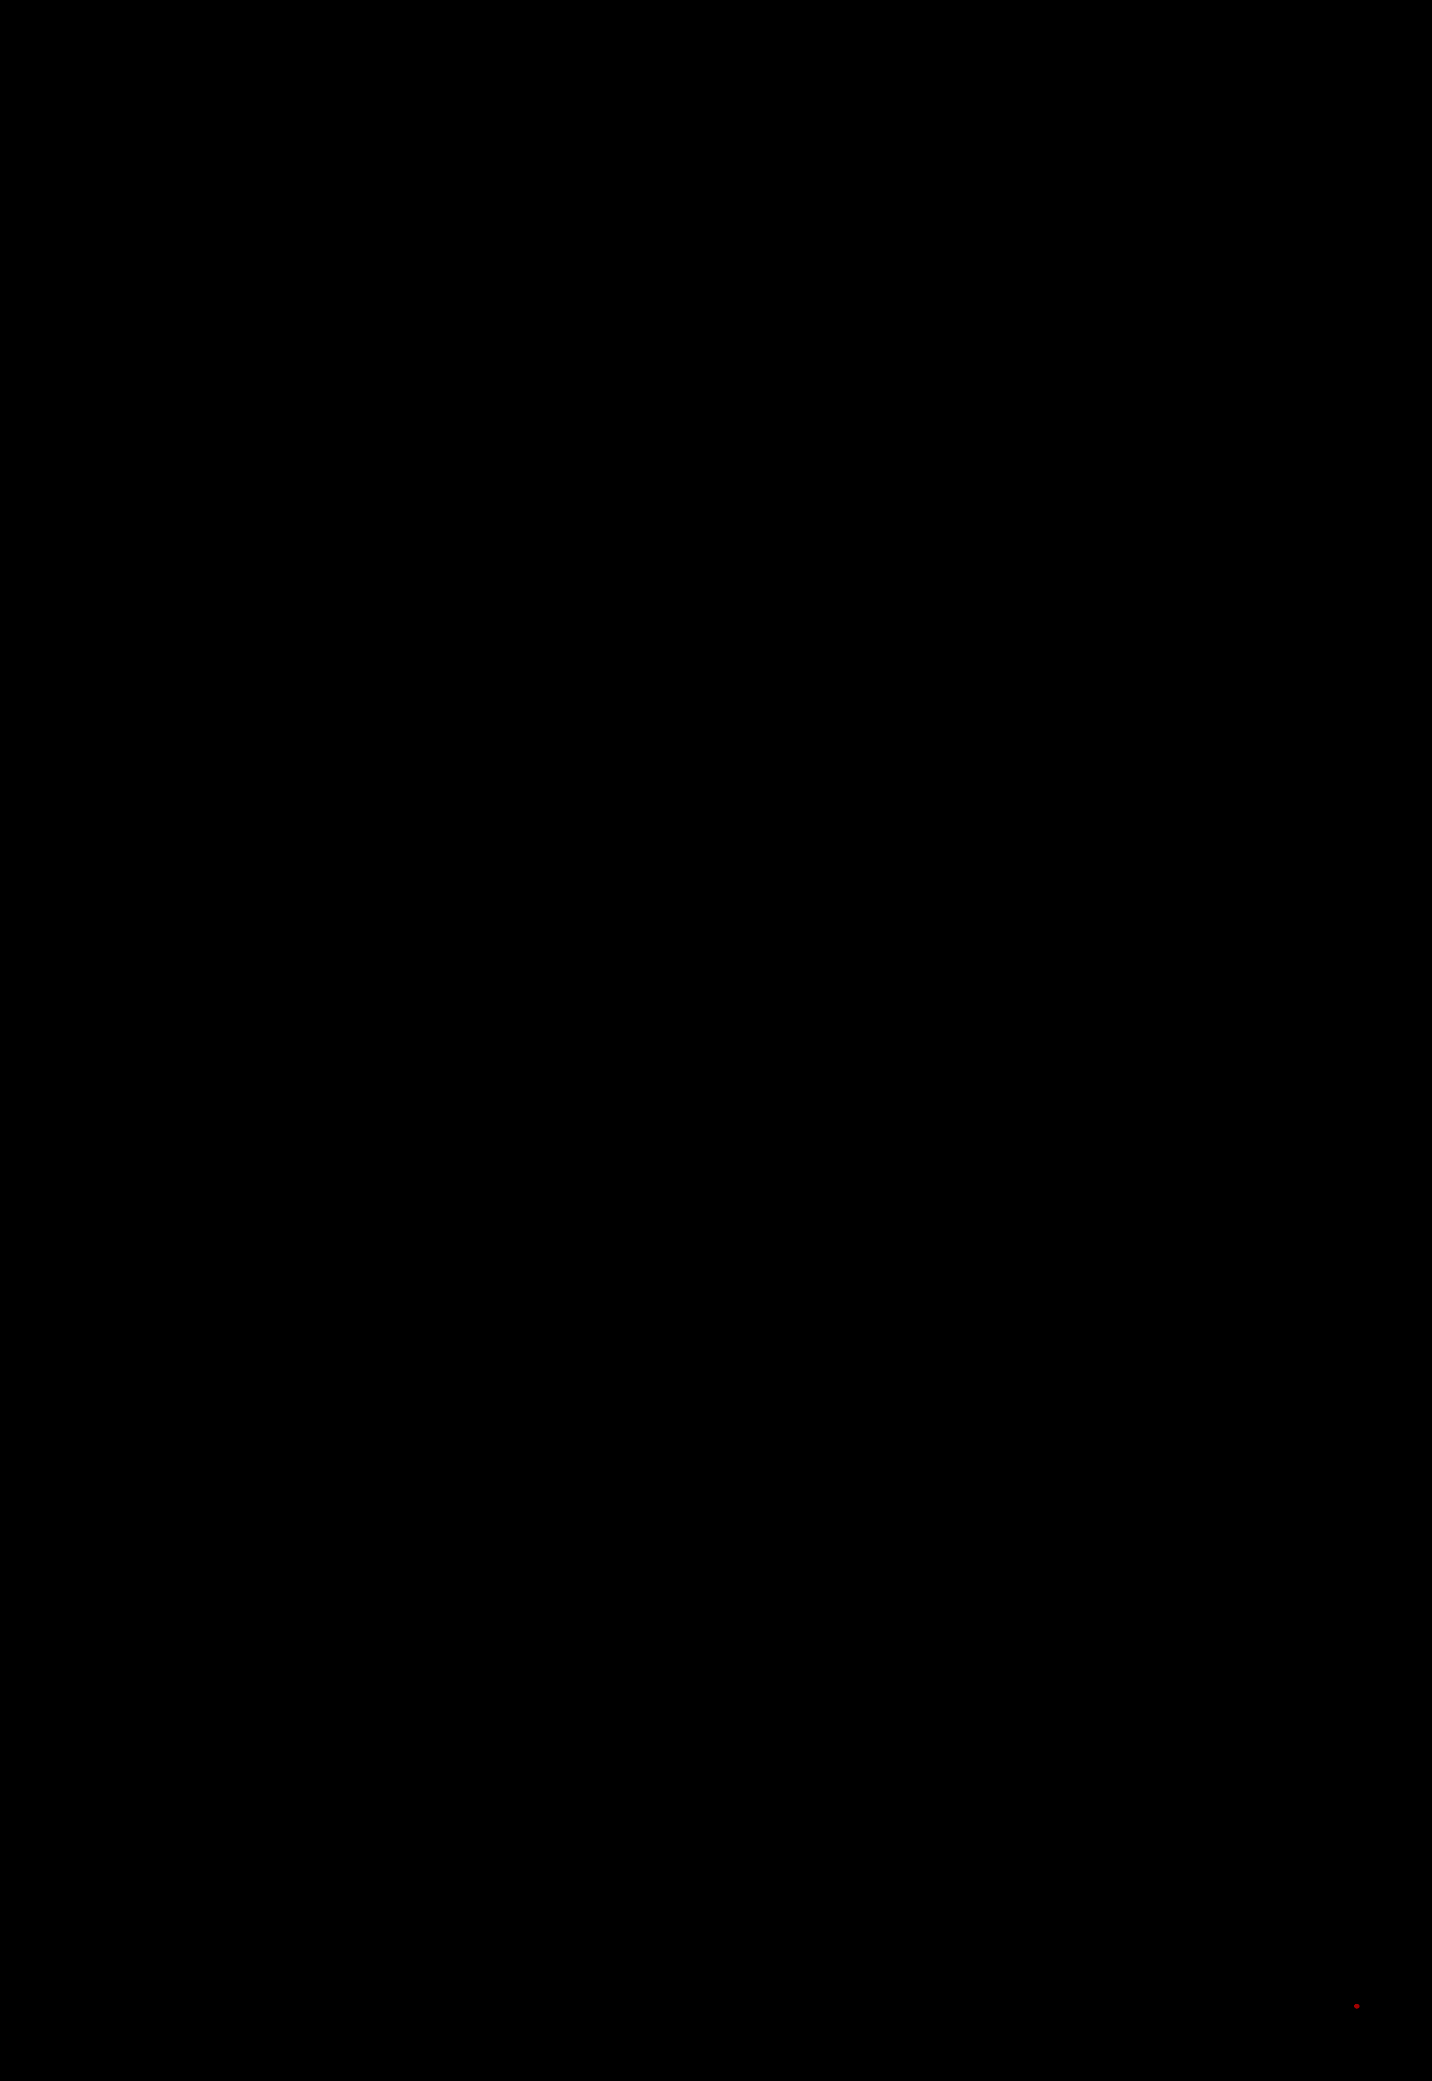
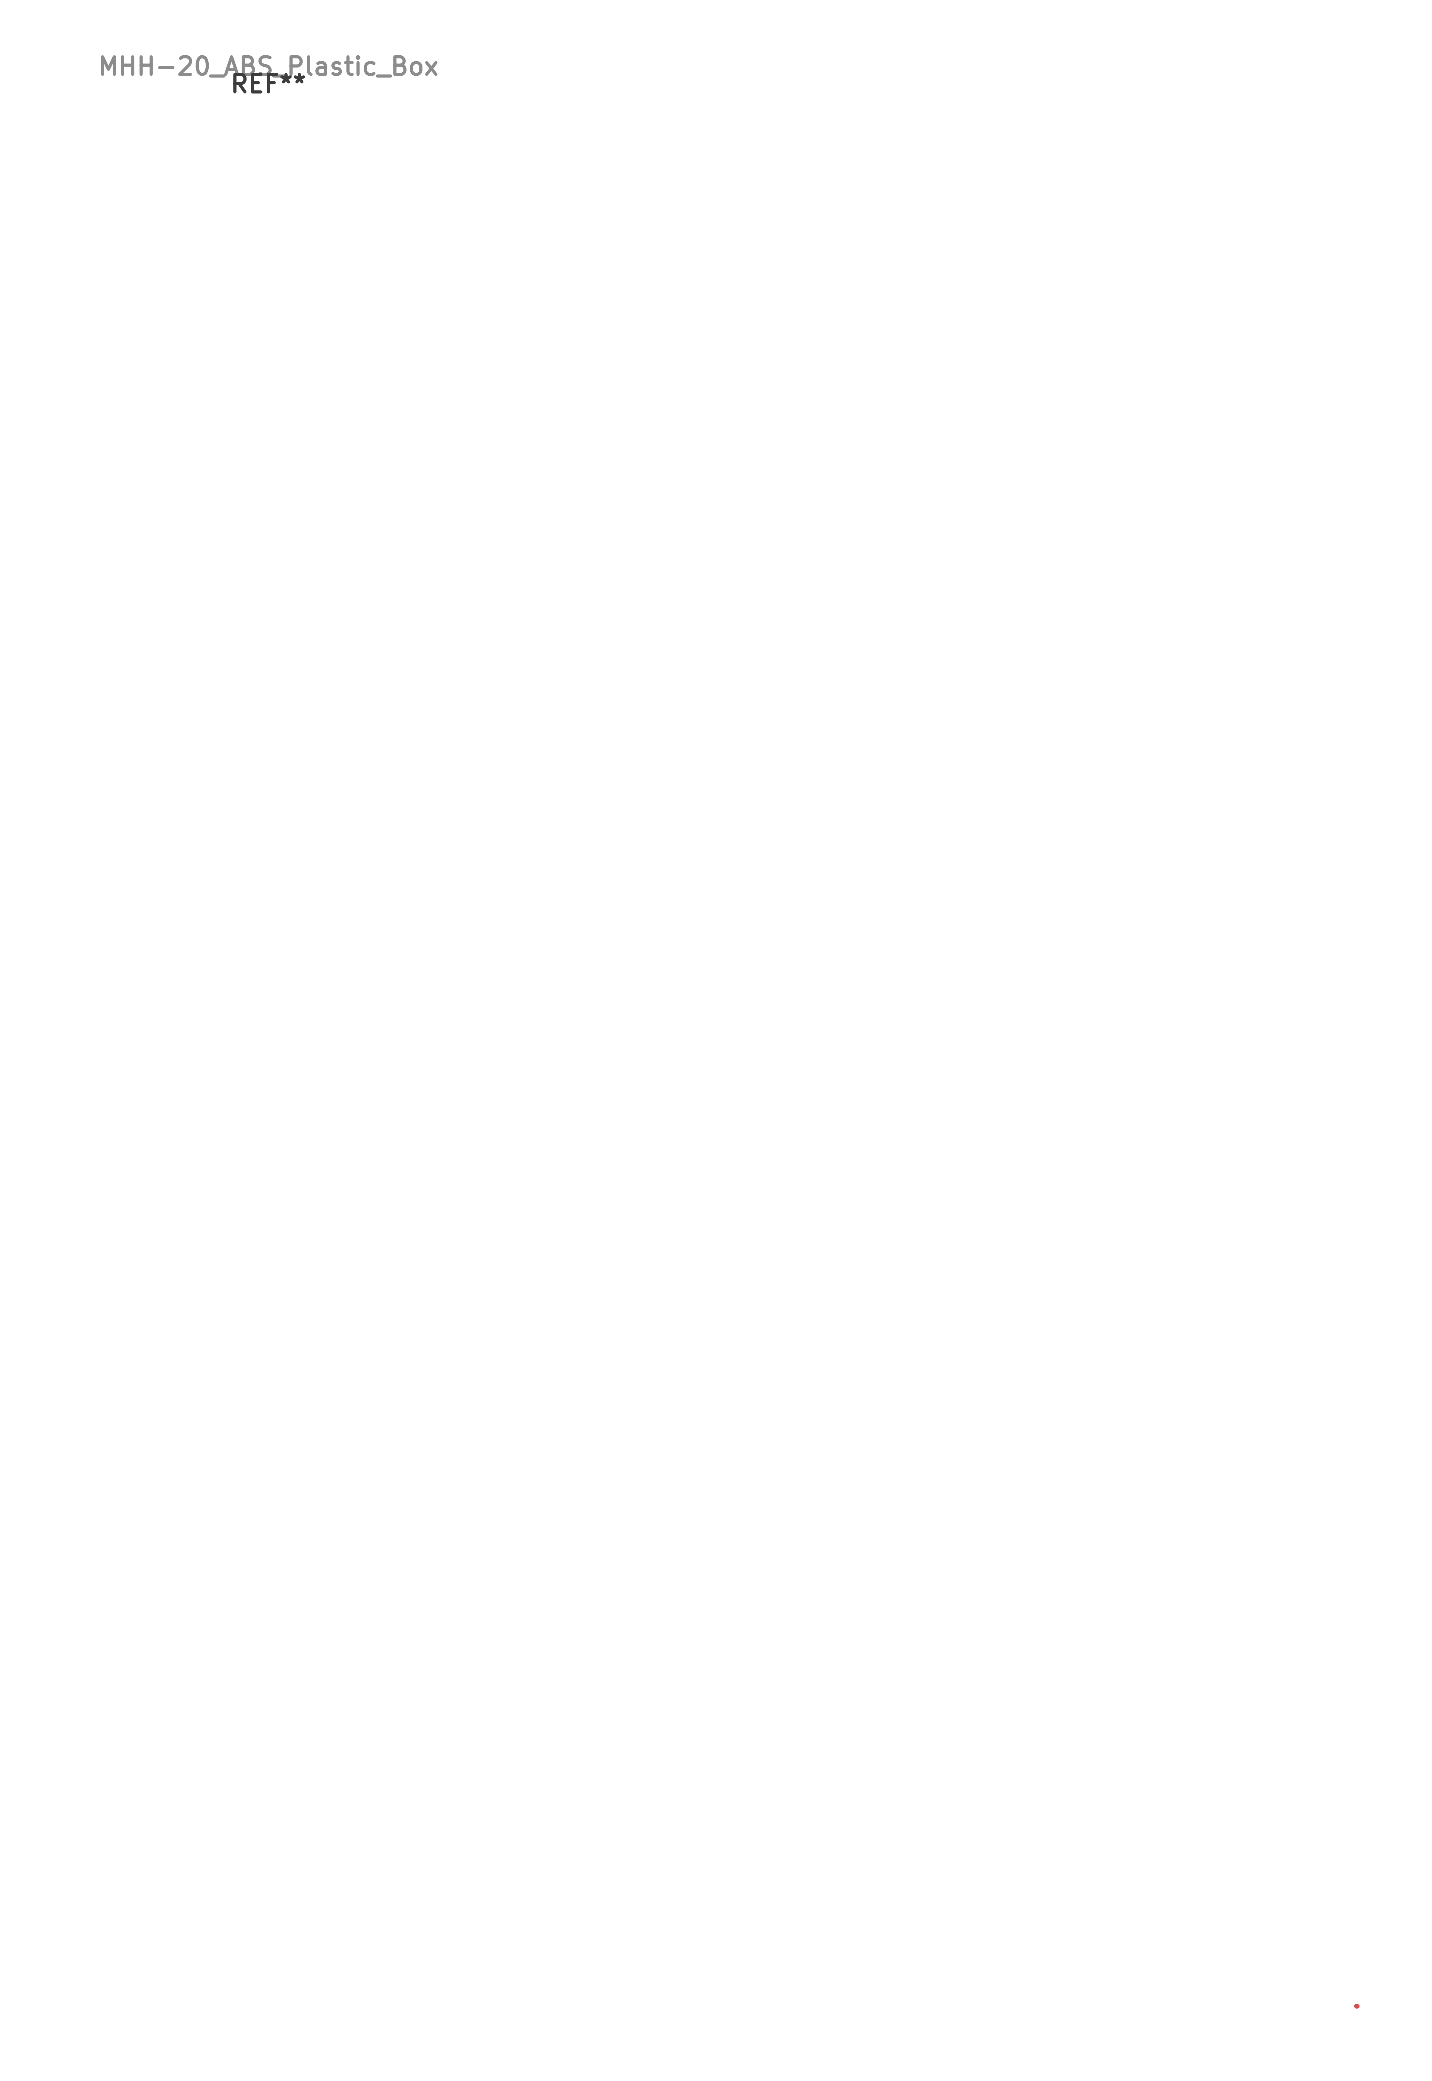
REF**: none -> MHH-20_ABS_Plastic_Box (269, 74)

